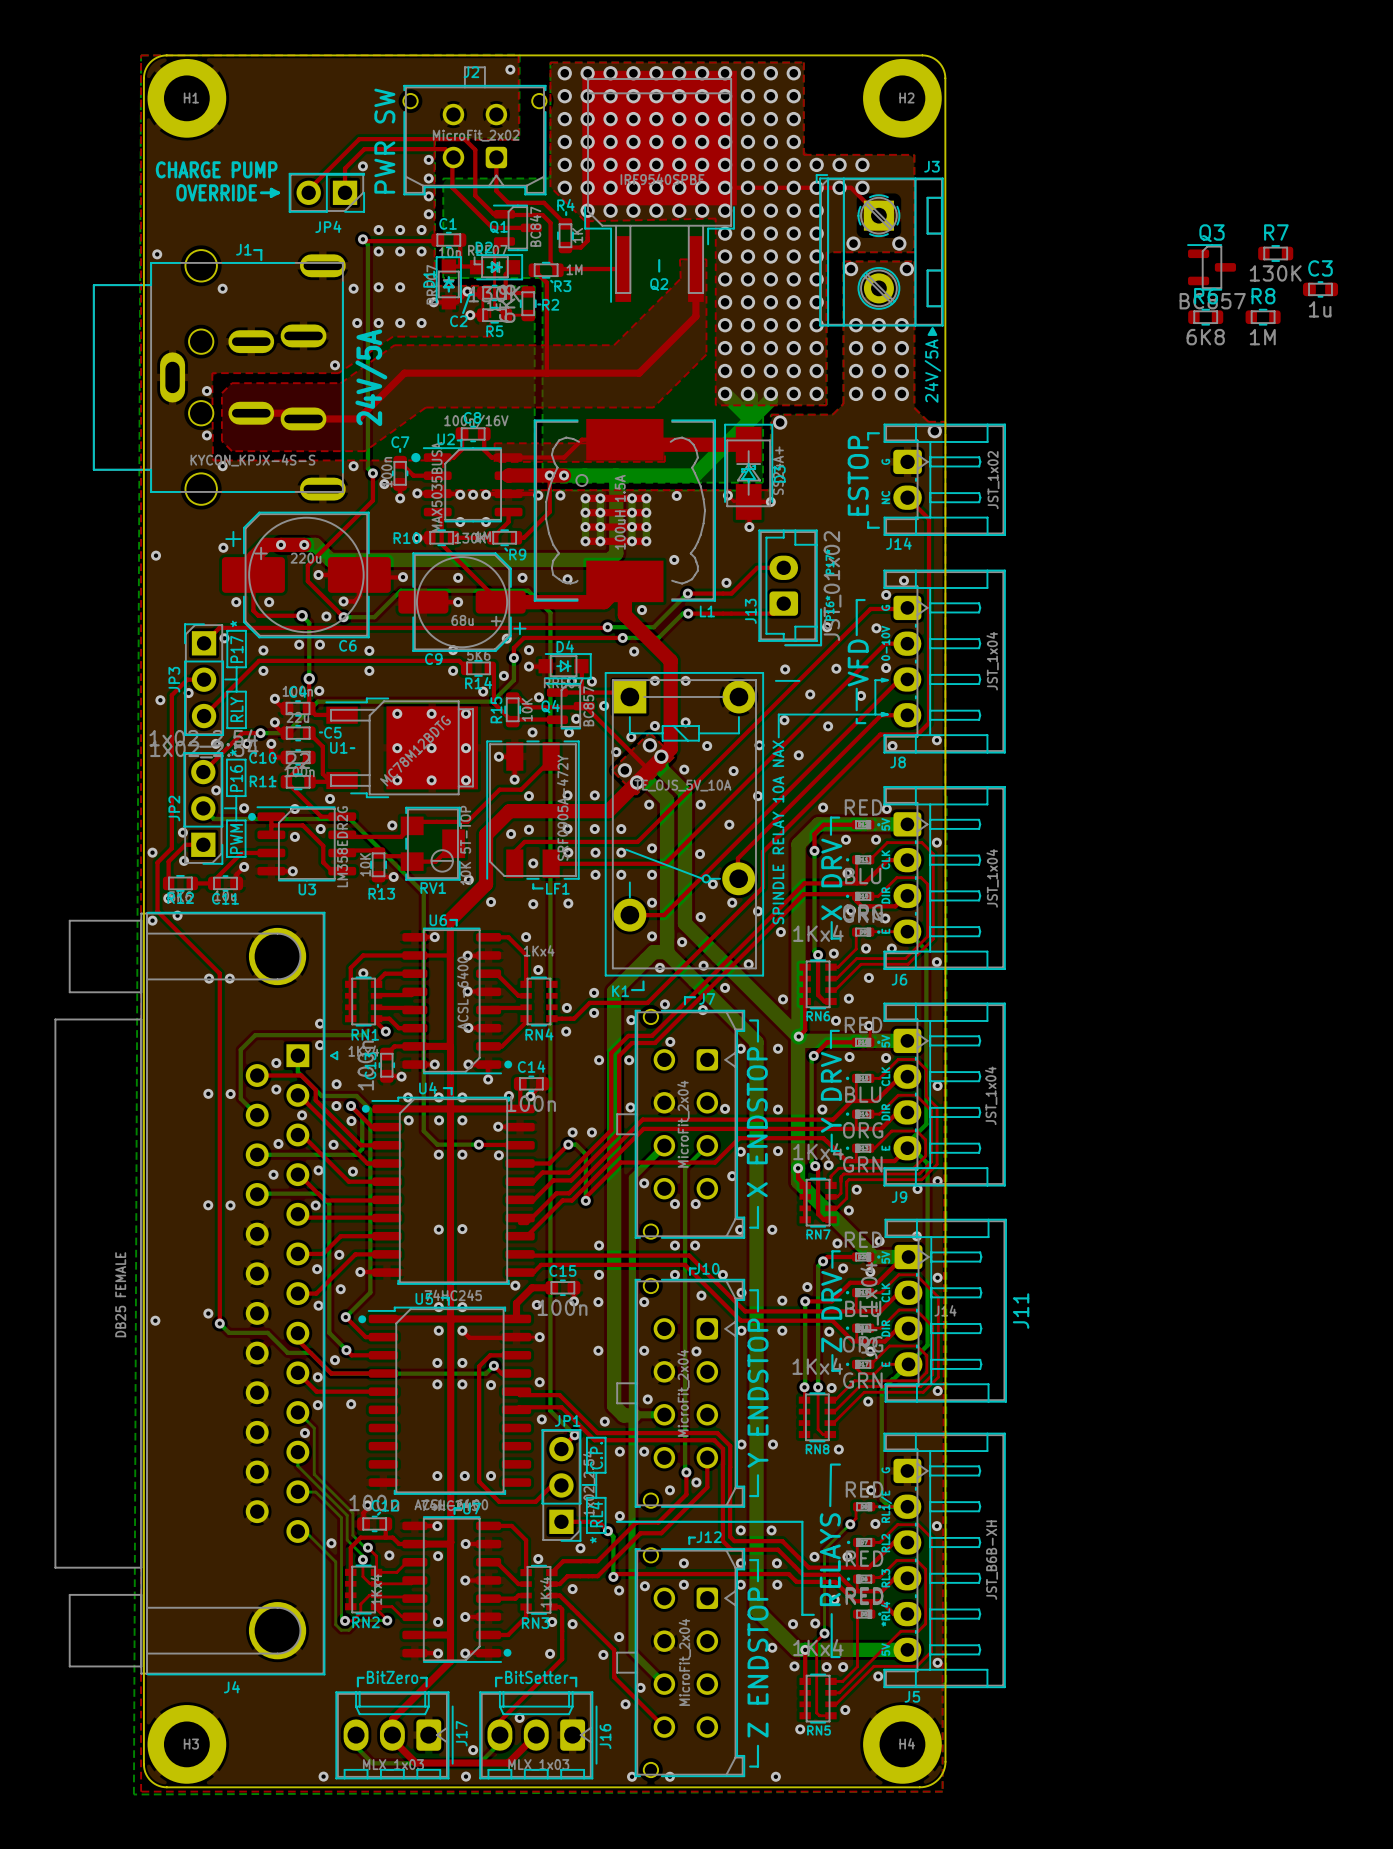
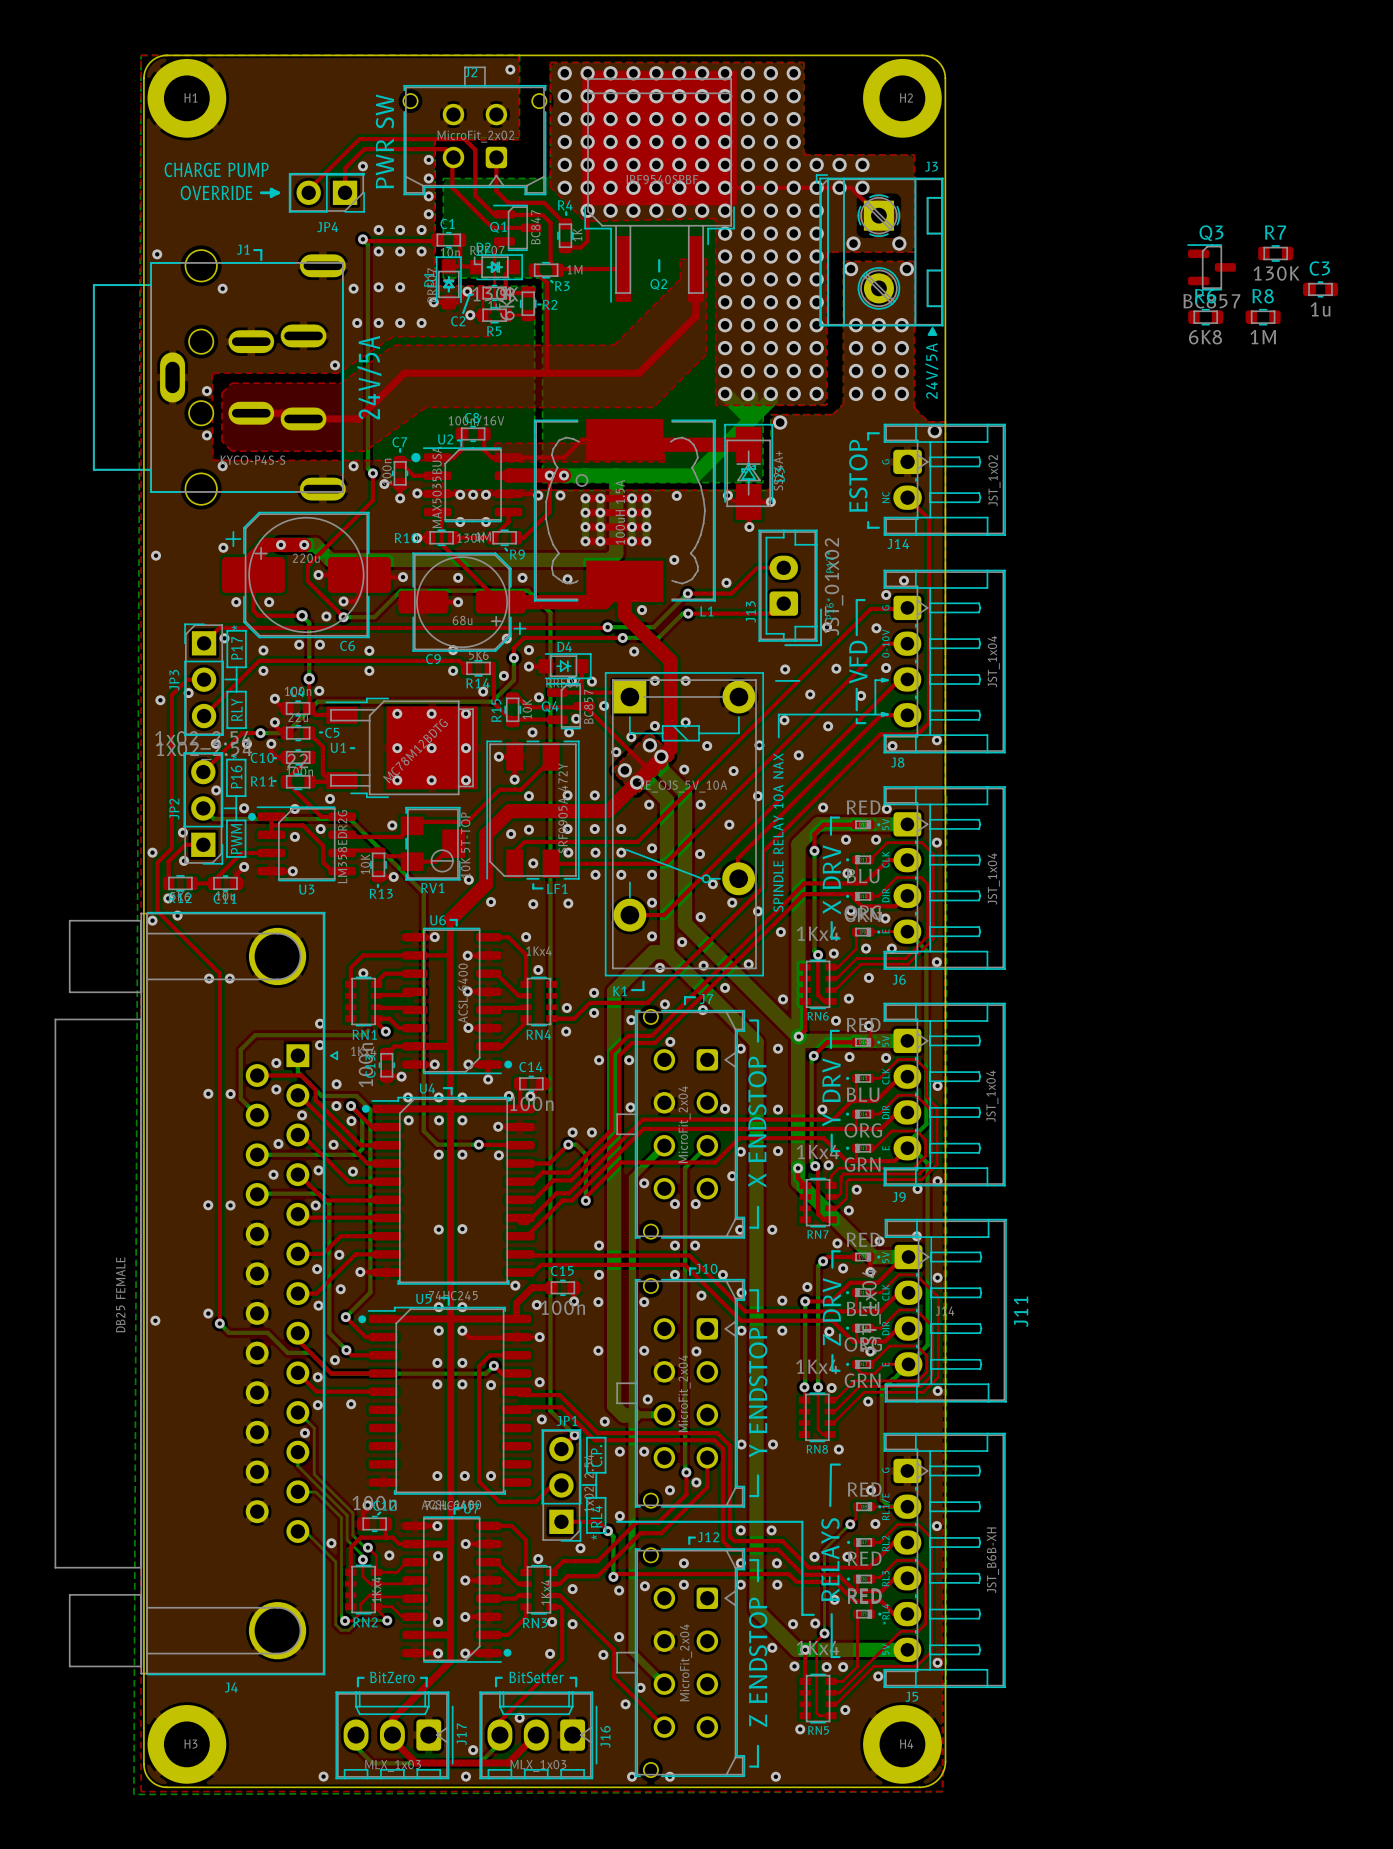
J1 value: KYCON_KPJX-4S-S (252, 460) -> KYCO-P4S-S (252, 460)

